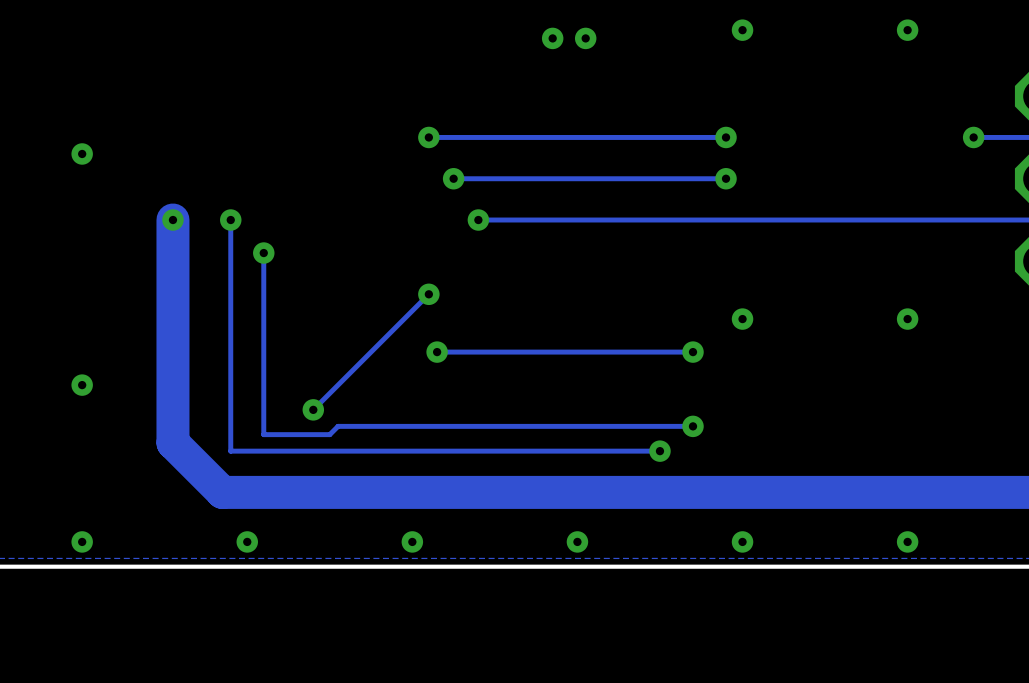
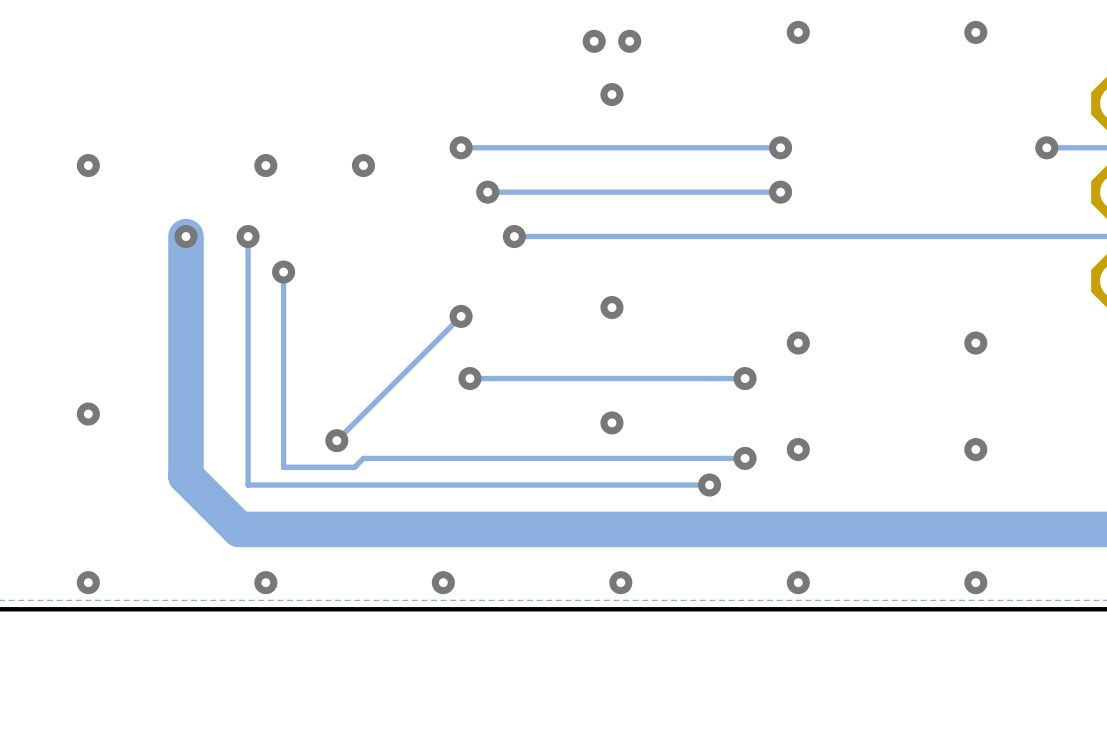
via: none -> (611, 94)
via: none -> (265, 165)
via: none -> (363, 165)
via: none -> (611, 307)
via: none -> (611, 422)
via: none -> (798, 449)
via: none -> (975, 449)

